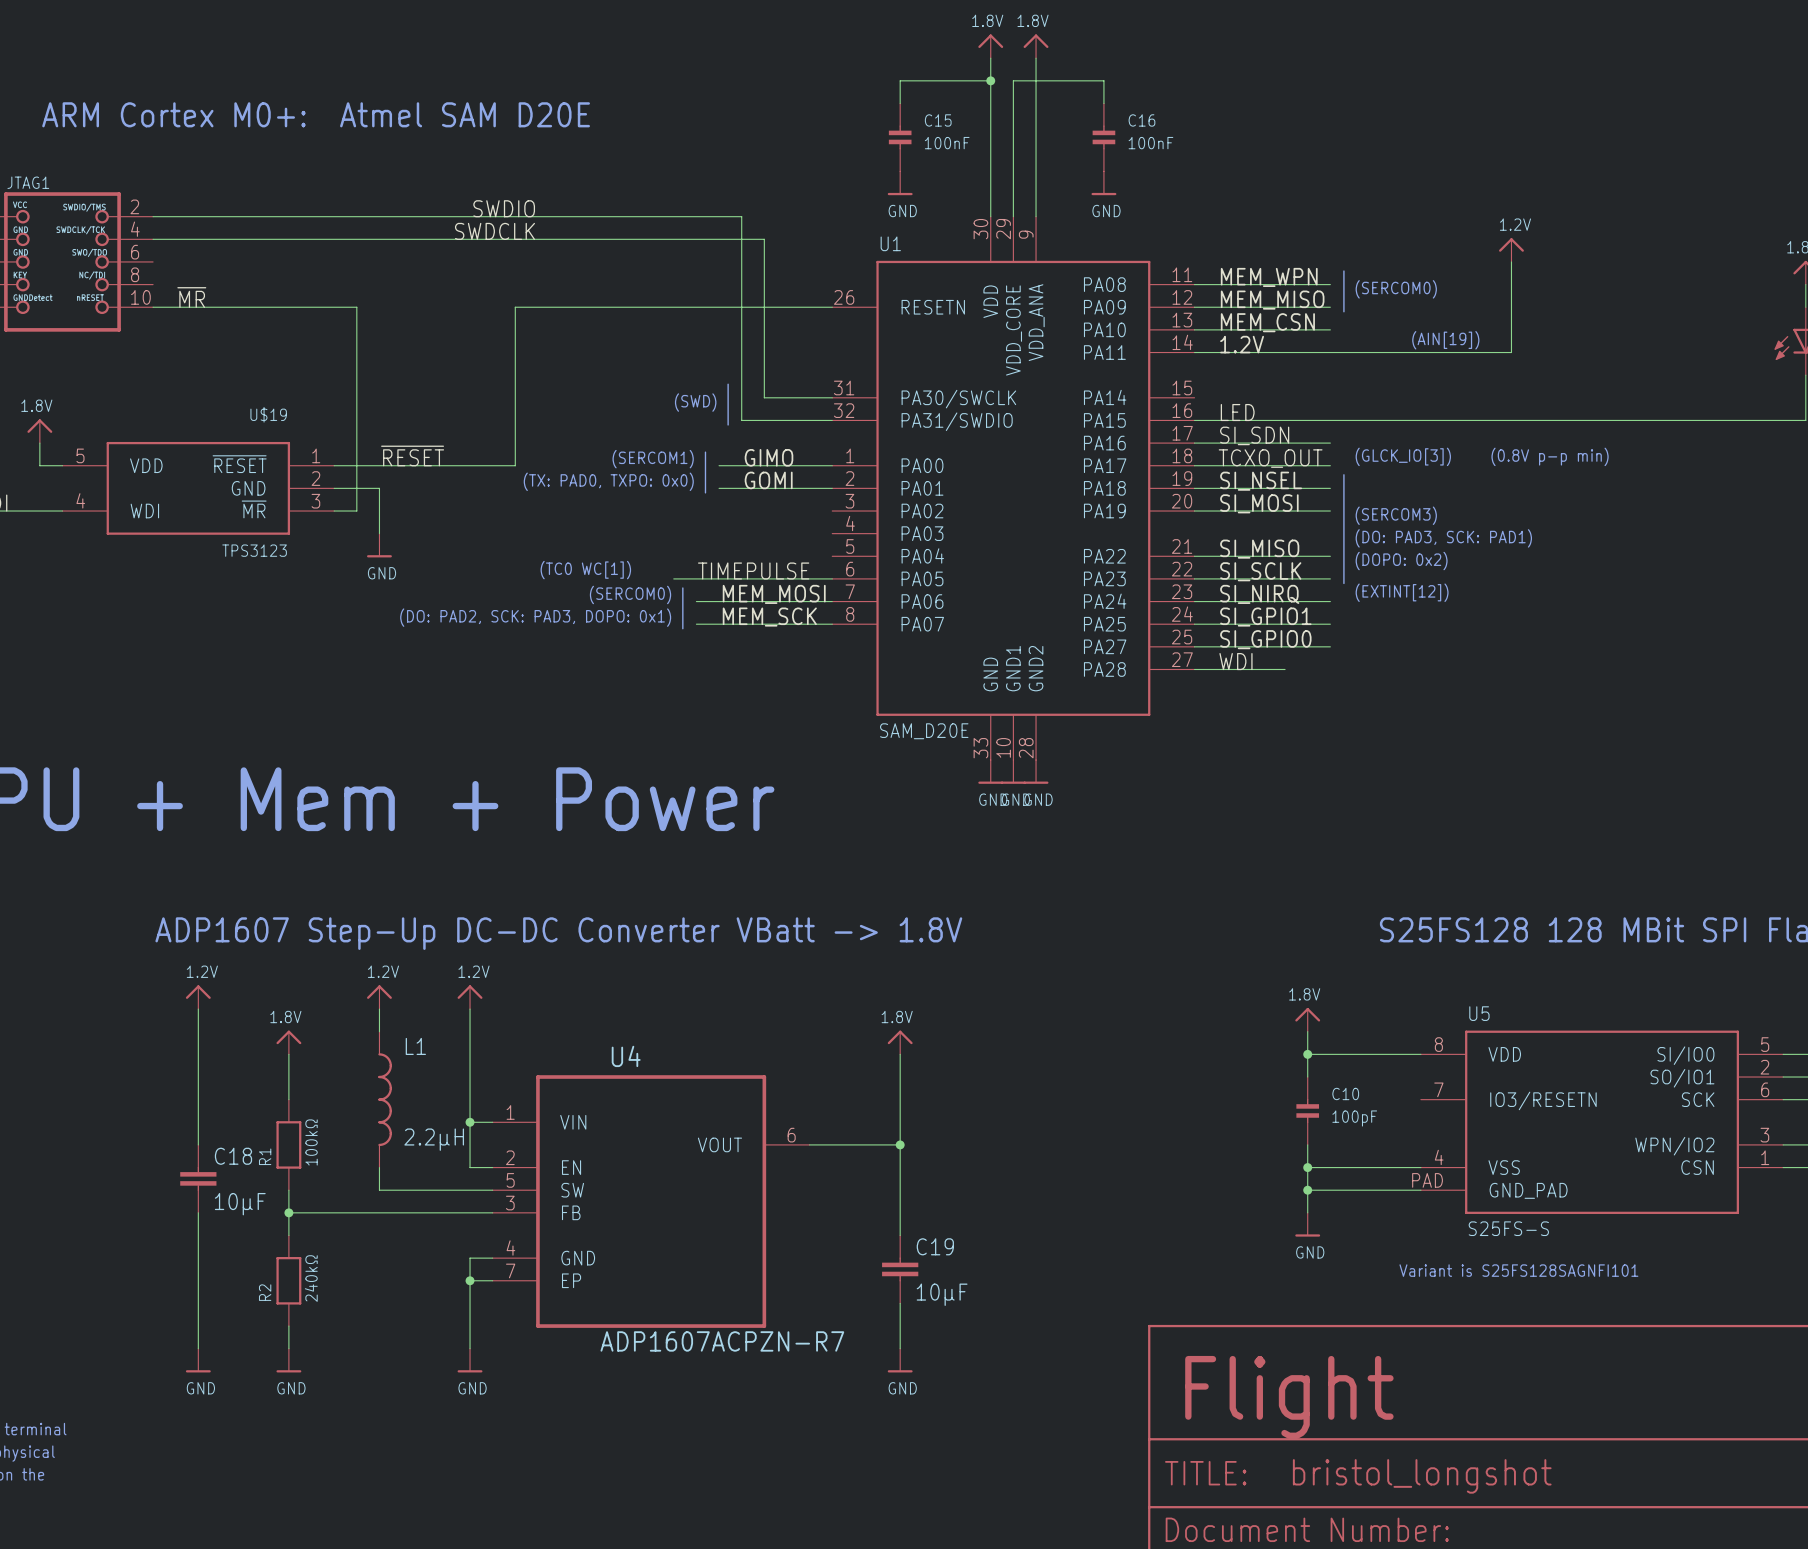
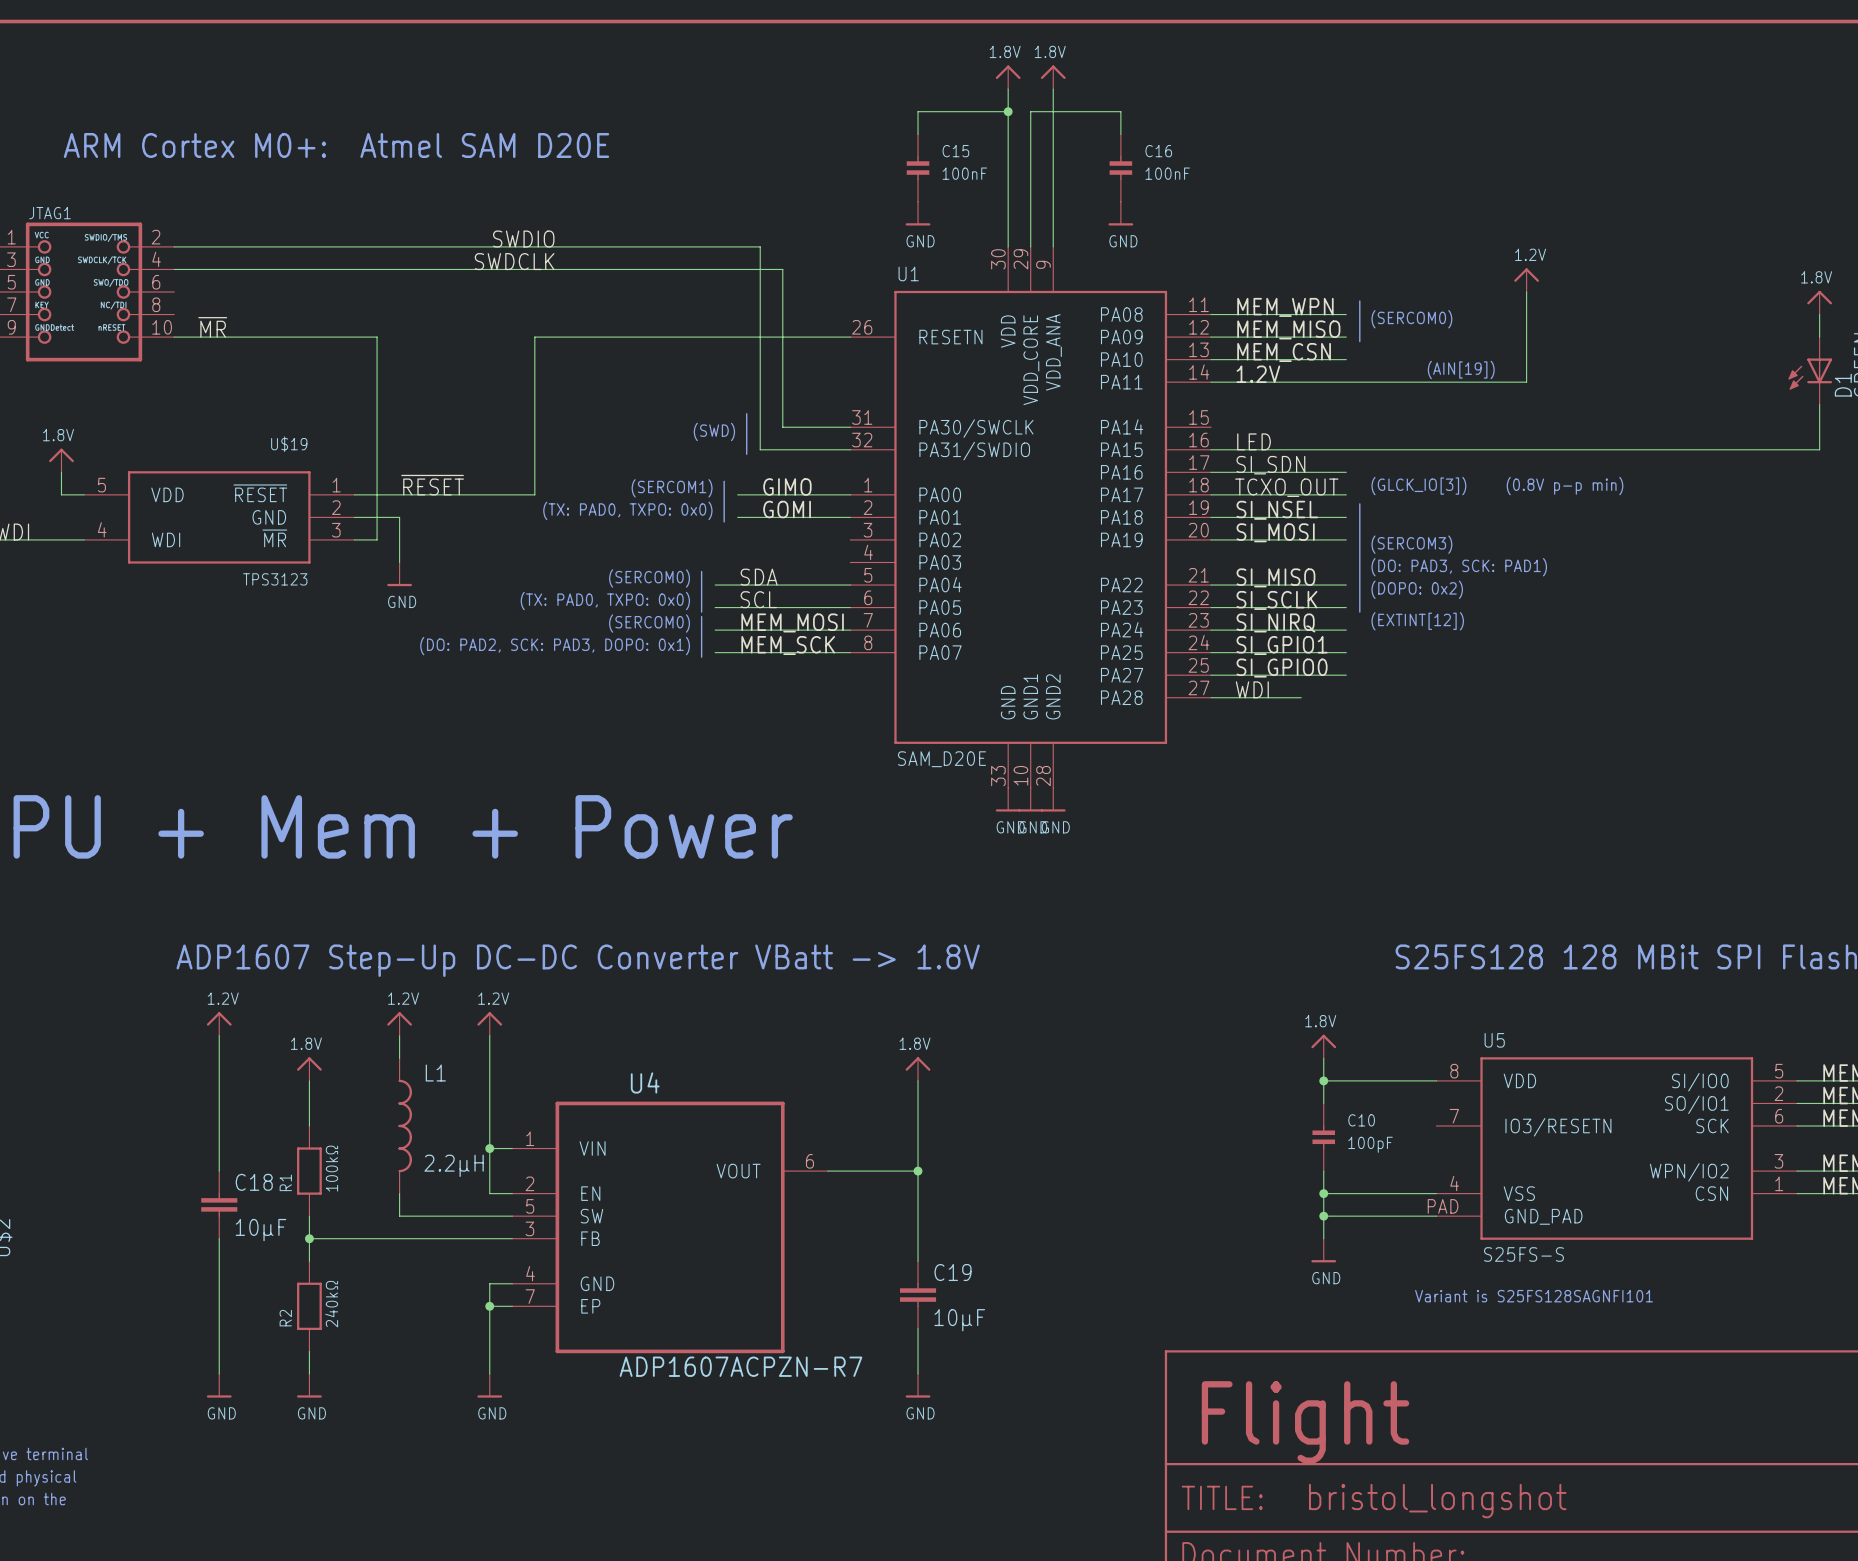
line: none -> (701, 571) (701, 612)
label: none -> SDA (759, 577)
text: none -> (SERCOM0) (649, 578)
wire: none -> (715, 585) (850, 585)
text: (TC0 WC[1]) (585, 570) -> none
label: none -> SCL (758, 599)
label: TIMEPULSE (753, 571) -> none
text: none -> (TX: PAD0, TXPO: 0x0) (605, 601)
wire: (673, 578) (696, 578) -> none

